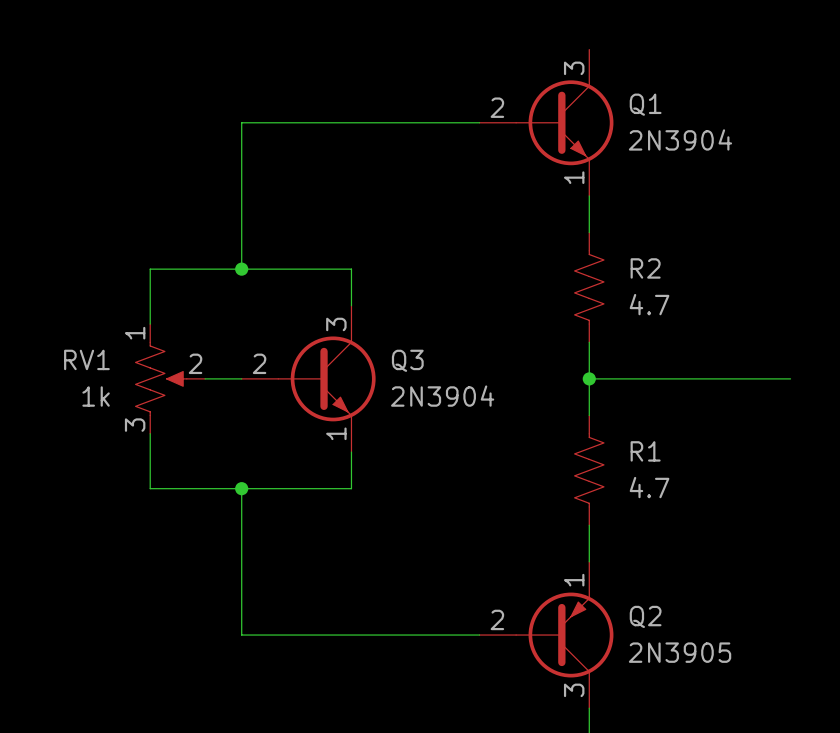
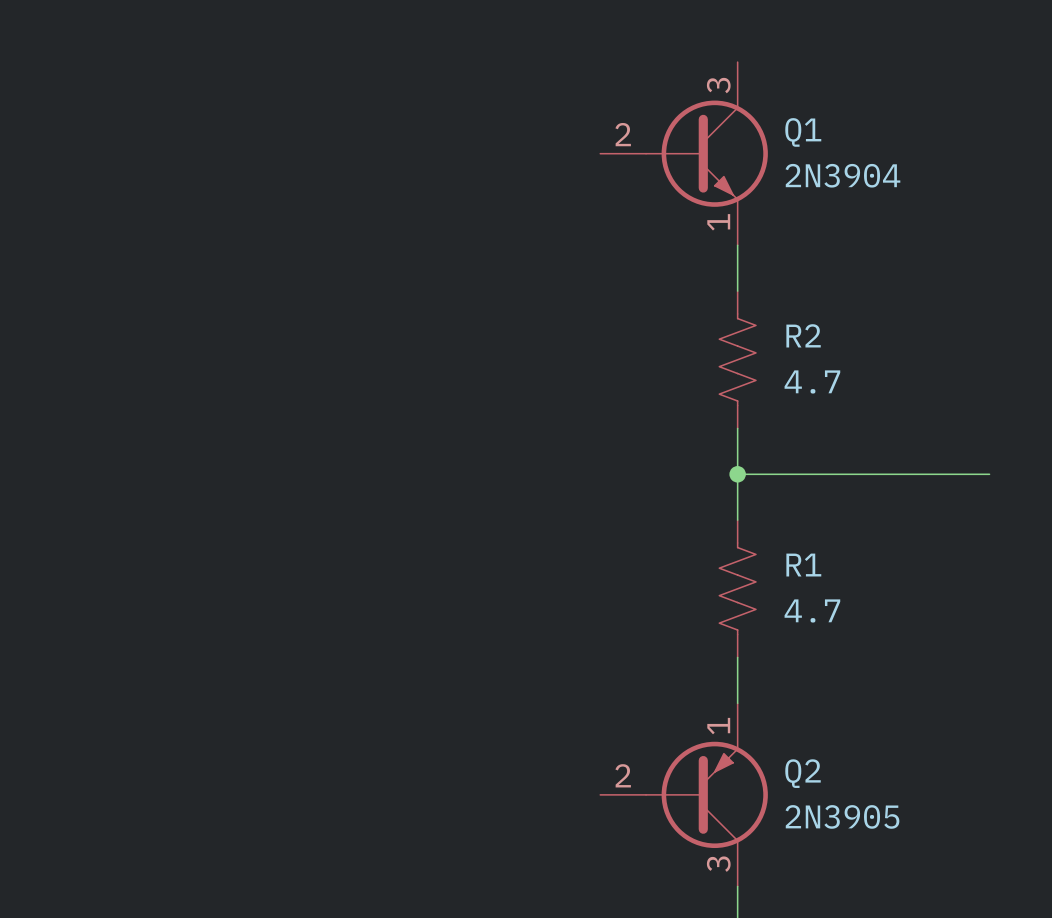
wire: (479, 122) (241, 122) (241, 269) -> none
junction: (241, 269) -> none
wire: (351, 305) (351, 269) (150, 269) (150, 324) -> none
RV1: 1k (170, 378) -> none
wire: (205, 378) (241, 378) -> none
Q3: 2N3904 (308, 378) -> none
wire: (150, 433) (150, 488) (351, 488) (351, 452) -> none
wire: (241, 488) (241, 635) (479, 635) -> none
junction: (241, 488) -> none

